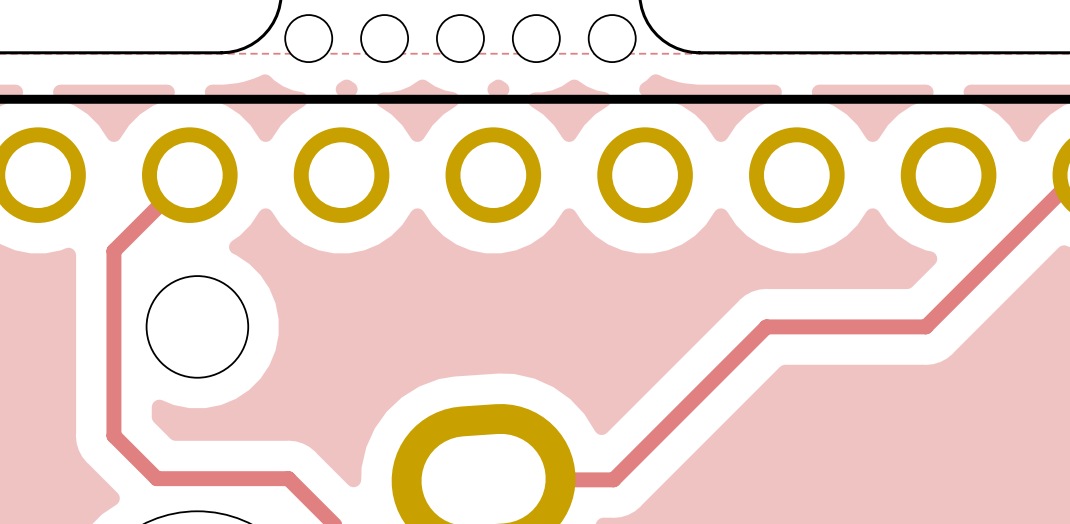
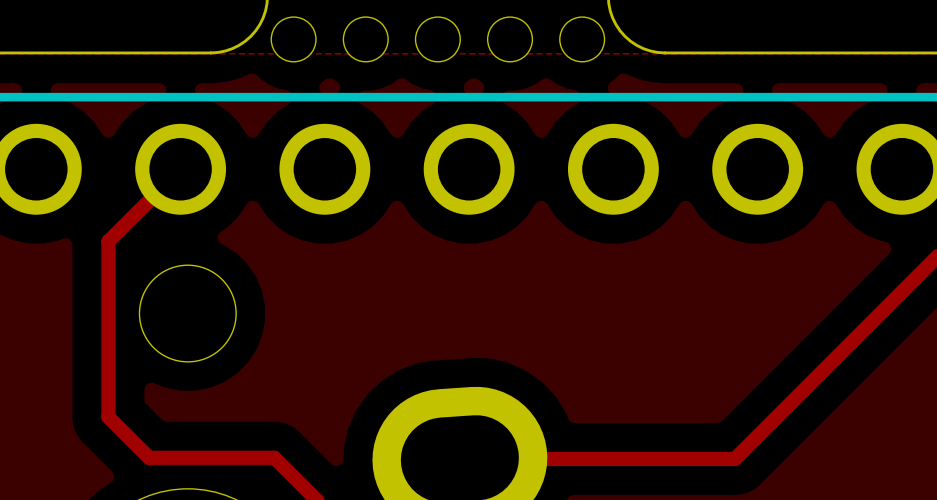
track: (925, 326) (766, 326) (613, 479) -> (880, 313) (734, 458) (583, 458)

